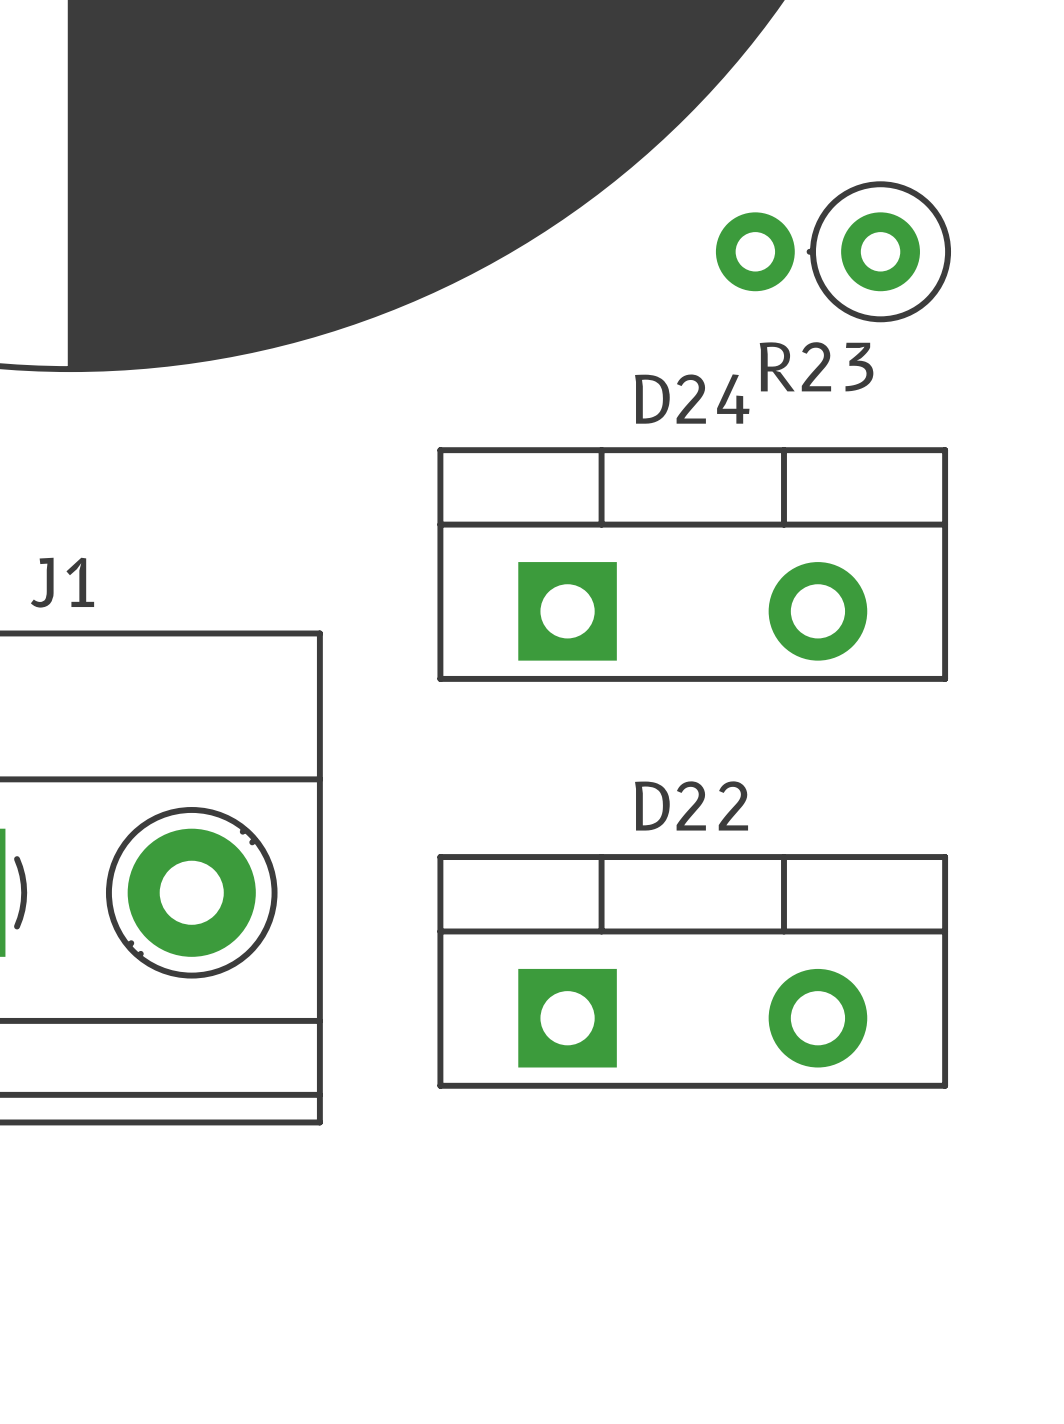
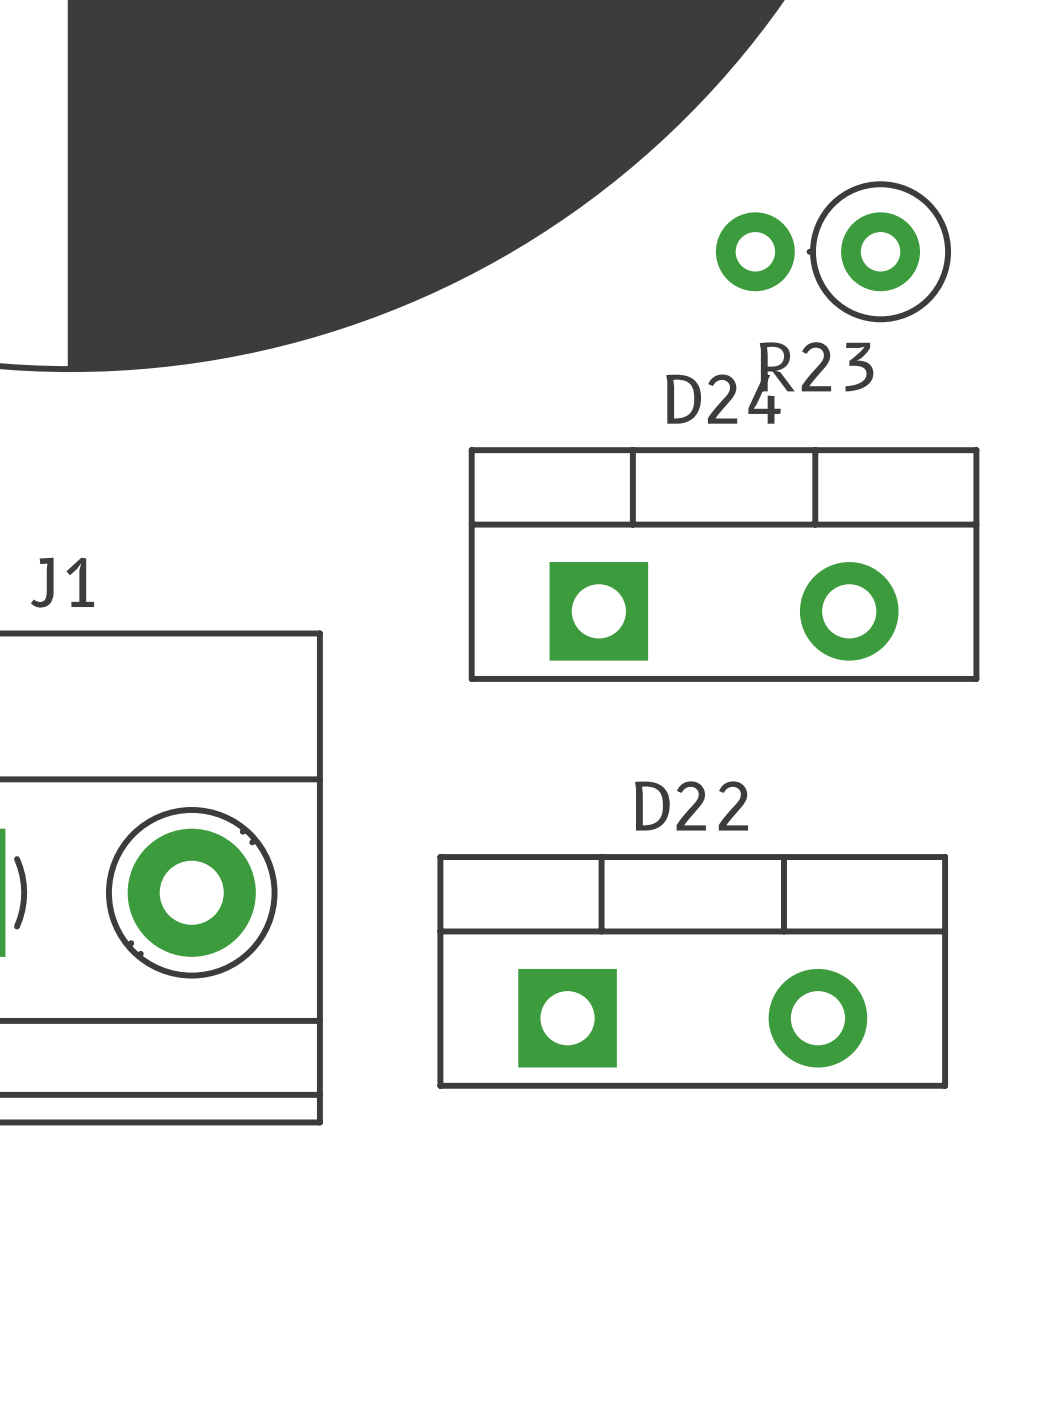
D24 position: (692, 564) -> (724, 564)

